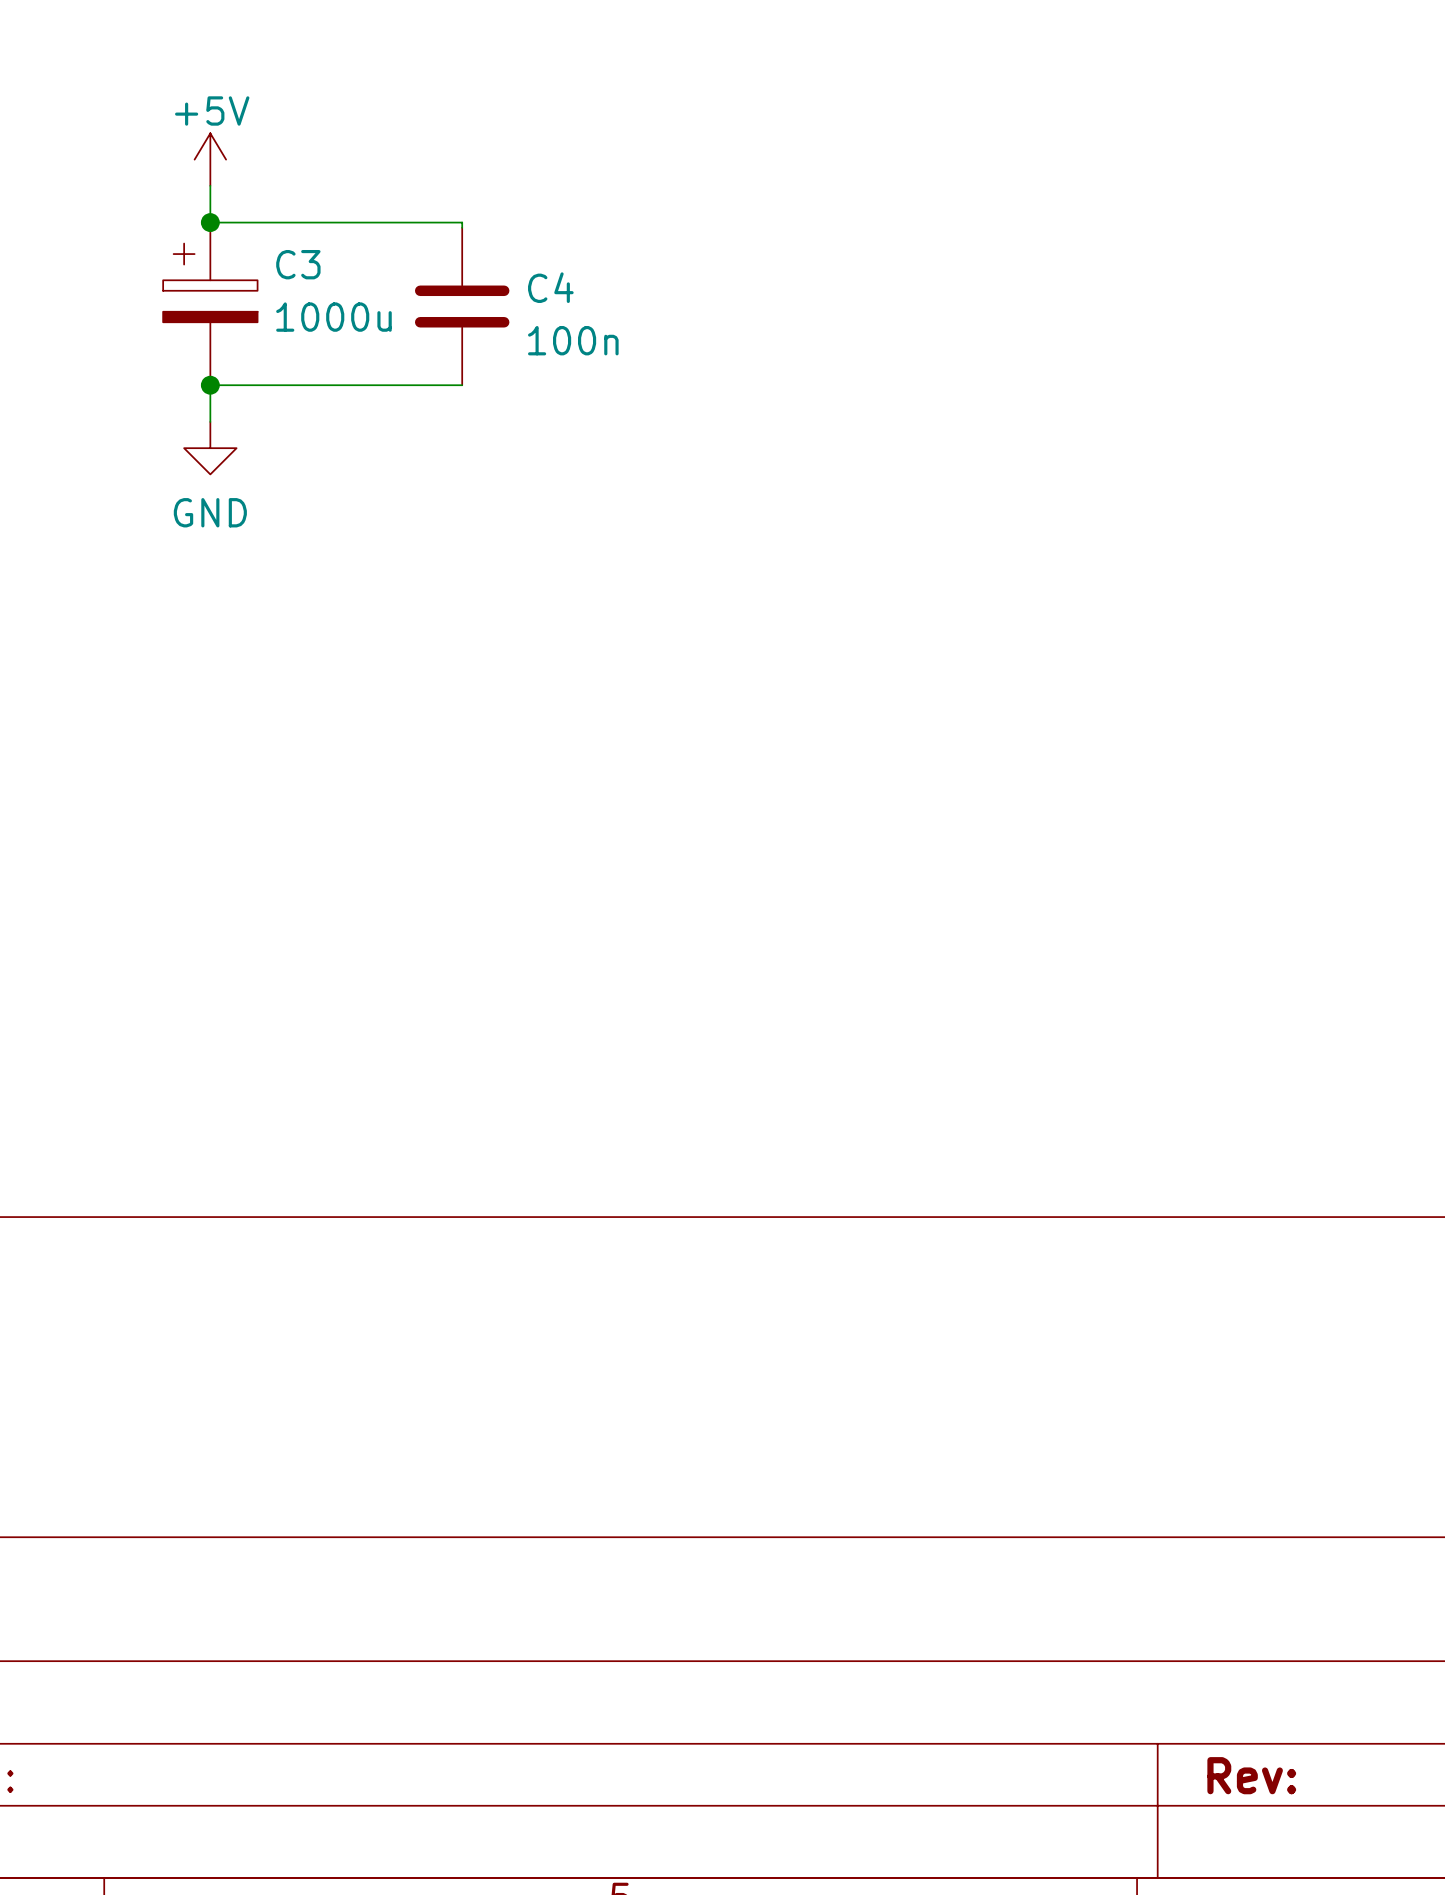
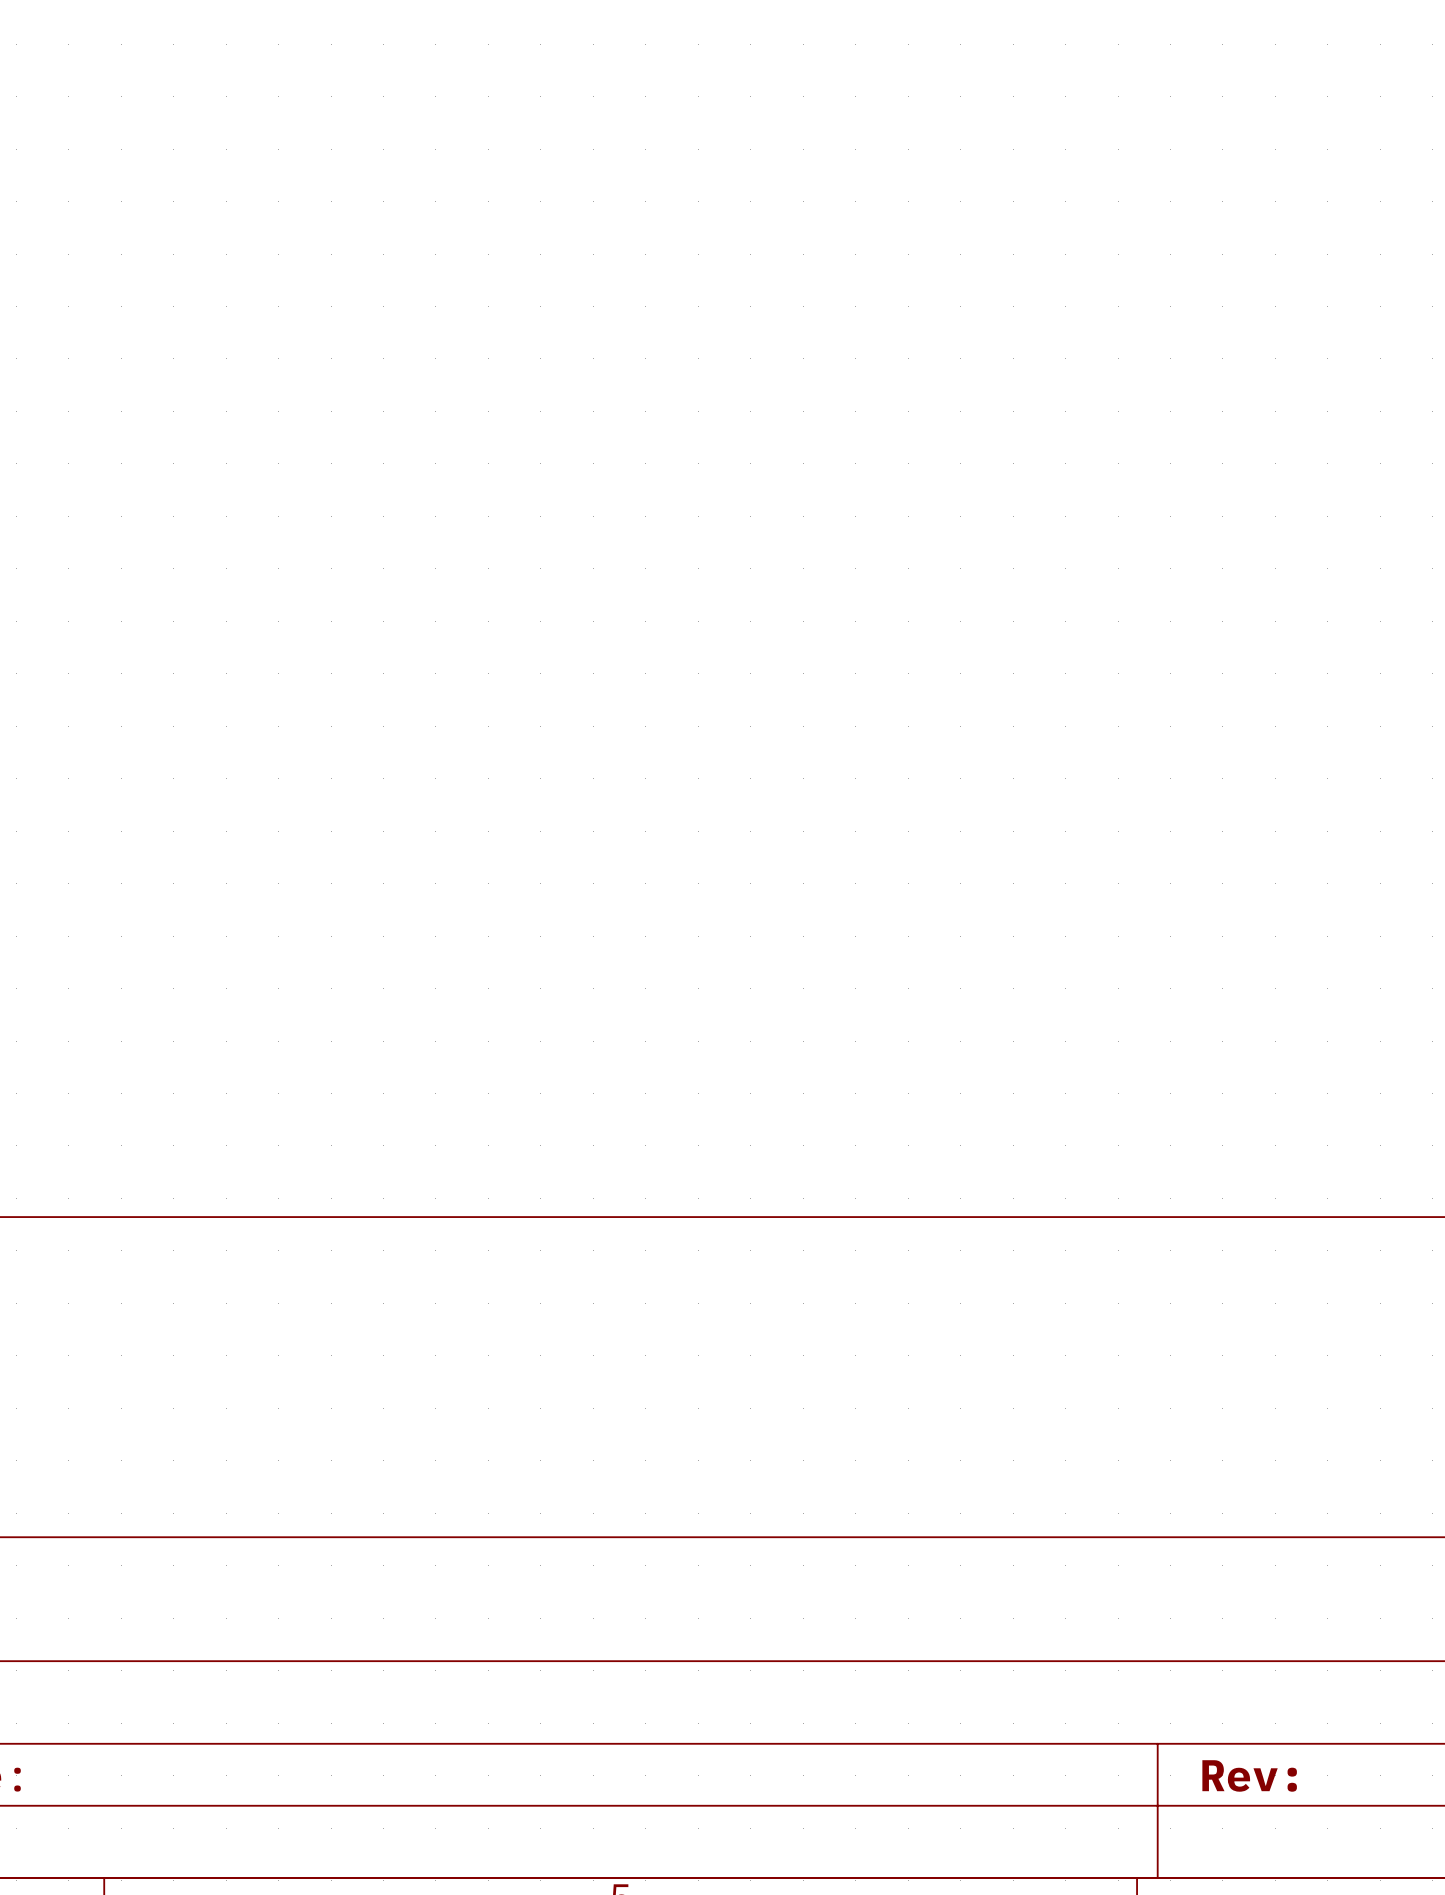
power symbol: +5V (210, 159) -> none
wire: (210, 185) (210, 222) (462, 222) (462, 227) -> none
junction: (210, 222) -> none
C3: 1000u (210, 301) -> none
C4: 100n (462, 306) -> none
wire: (210, 379) (210, 421) -> none
wire: (210, 385) (462, 385) -> none
junction: (210, 385) -> none
power symbol: GND (210, 448) -> none

